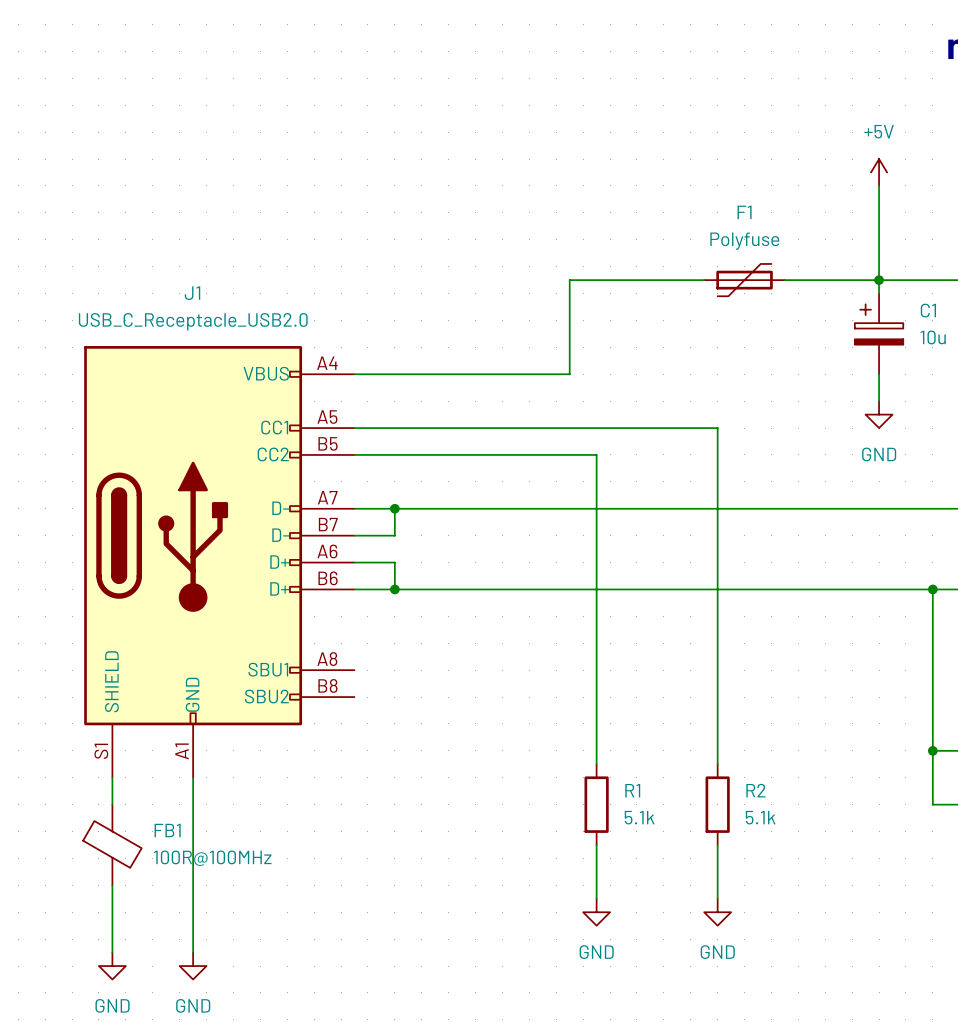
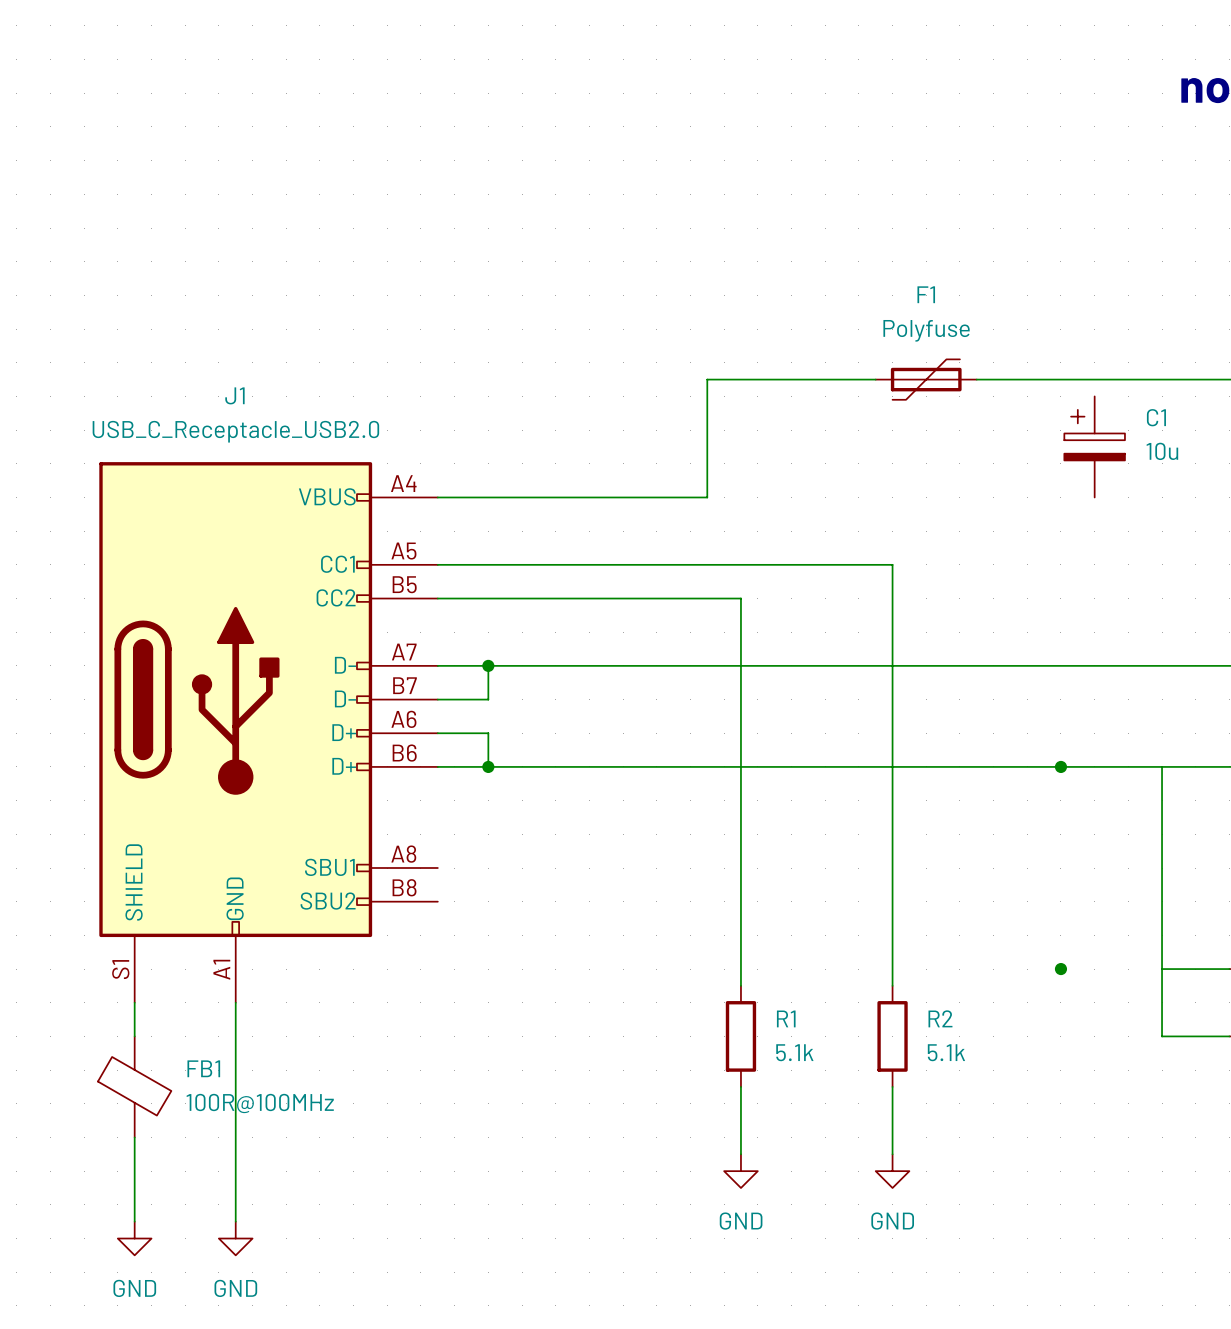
power symbol: +5V (879, 172) -> none
wire: (879, 185) (879, 293) -> none
junction: (879, 280) -> none
wire: (879, 374) (879, 401) -> none
power symbol: GND (879, 414) -> none
junction: none -> (1060, 766)
junction: (932, 589) -> none
junction: none -> (1060, 969)
junction: (932, 750) -> none

